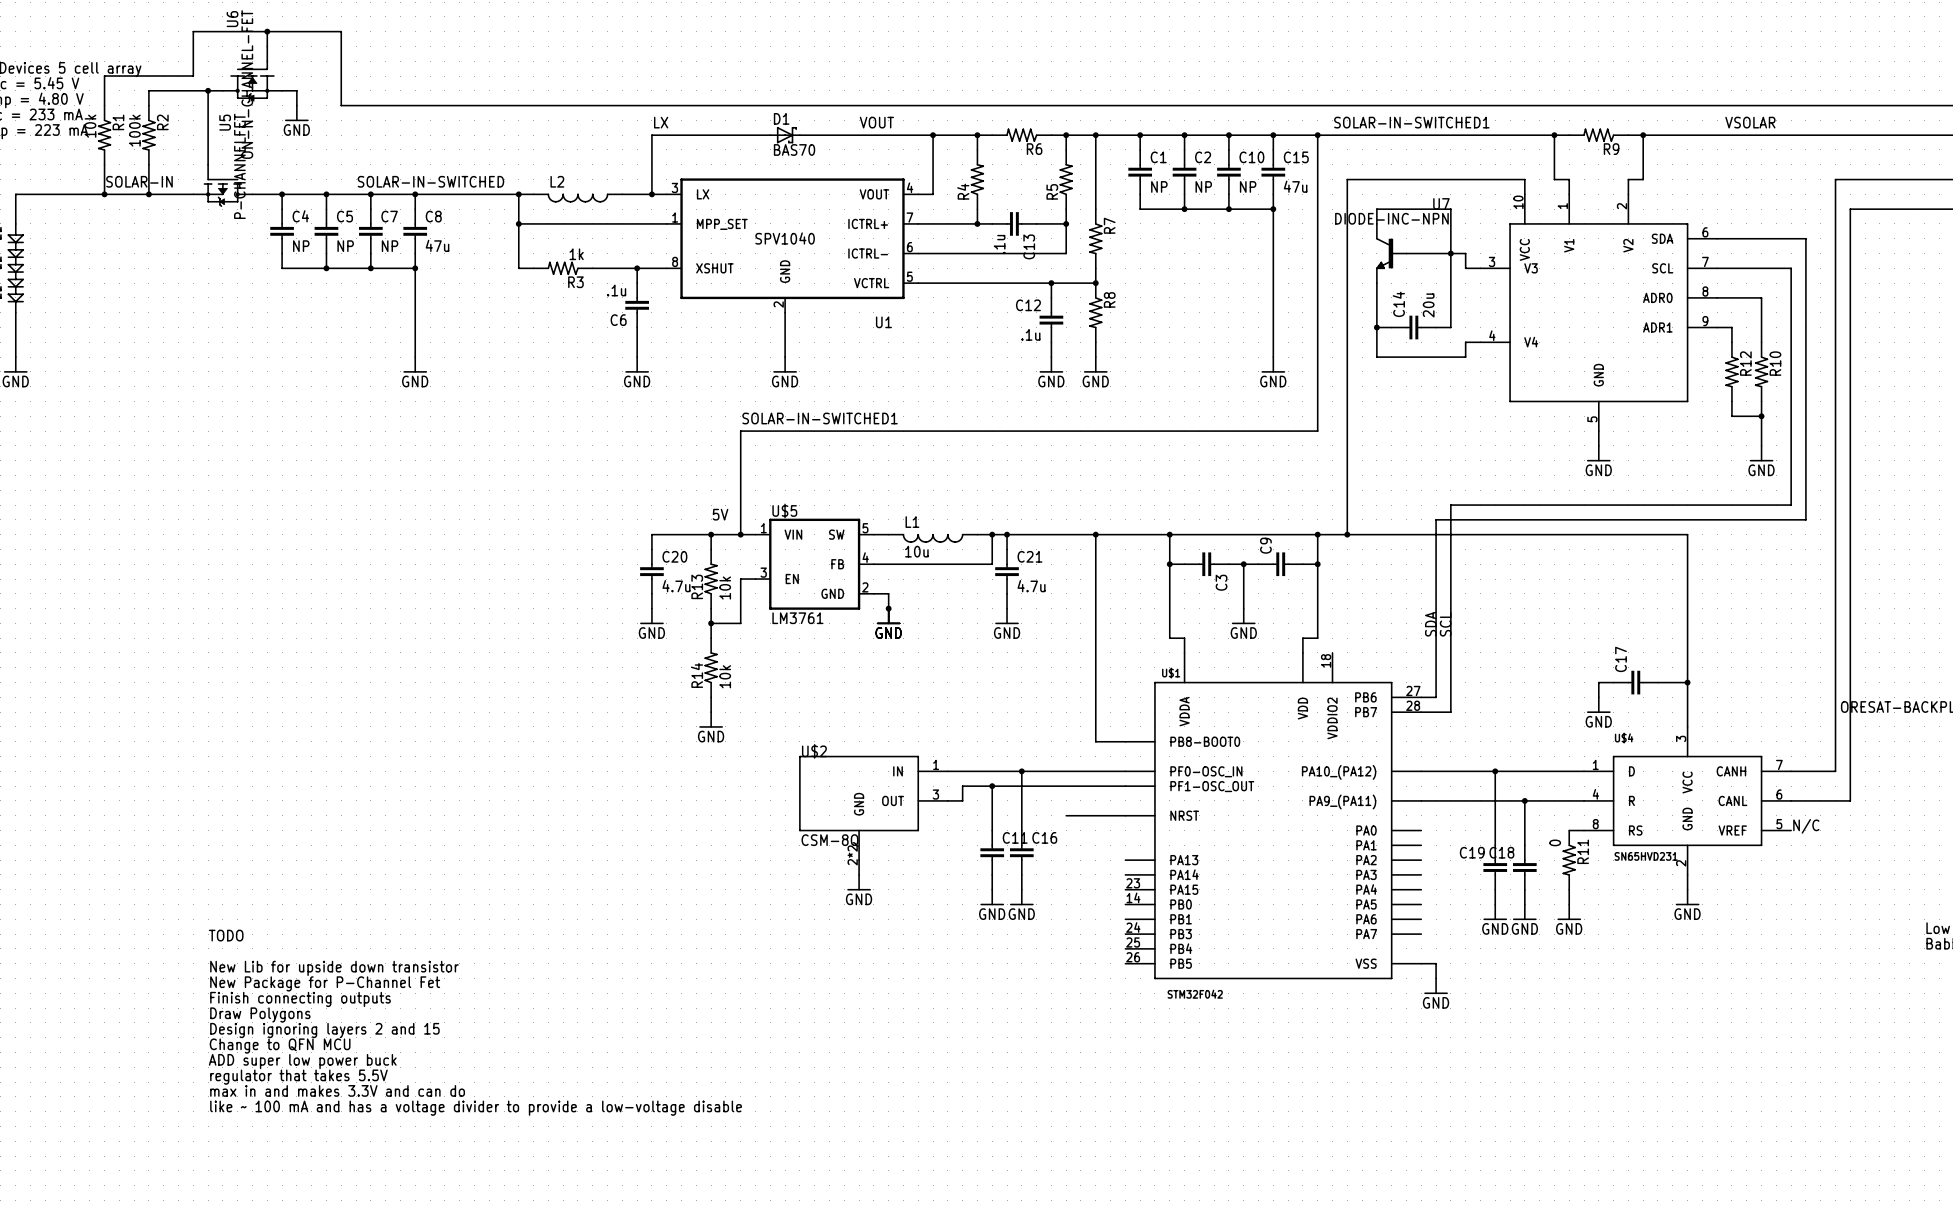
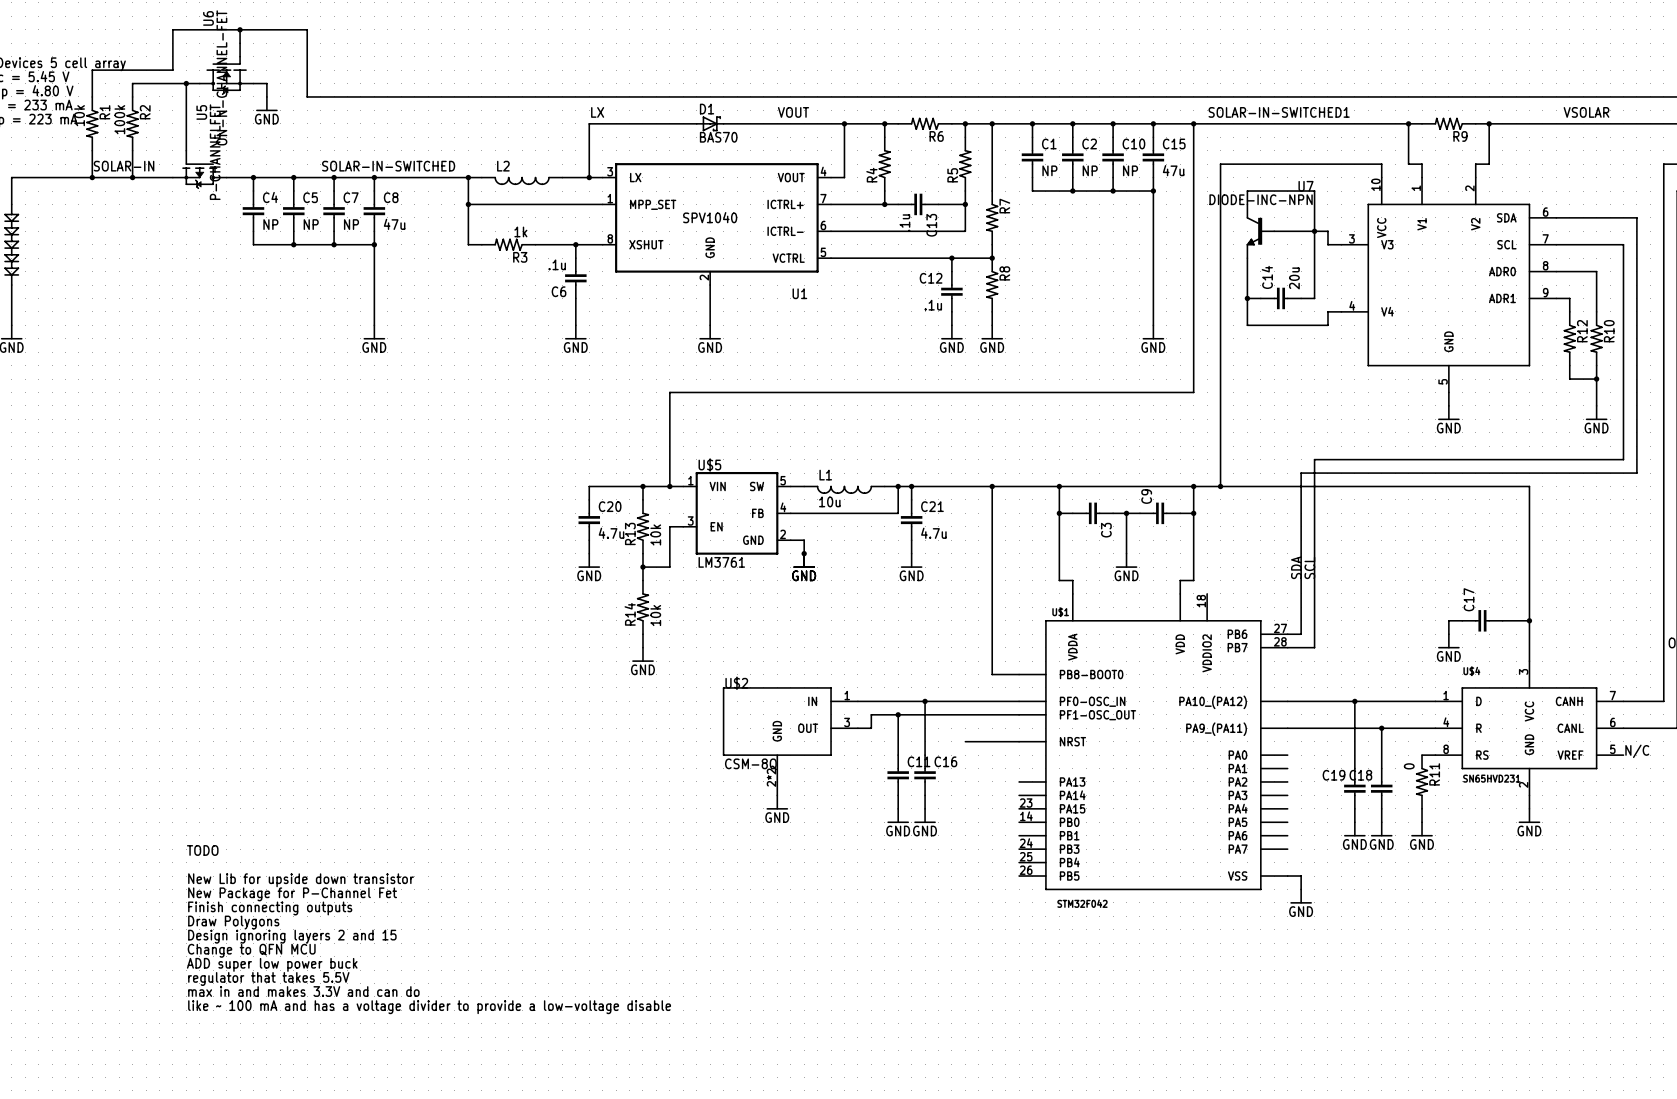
label: SOLAR-IN-SWITCHED1 (820, 418) -> none
text: 5V (720, 514) -> none

